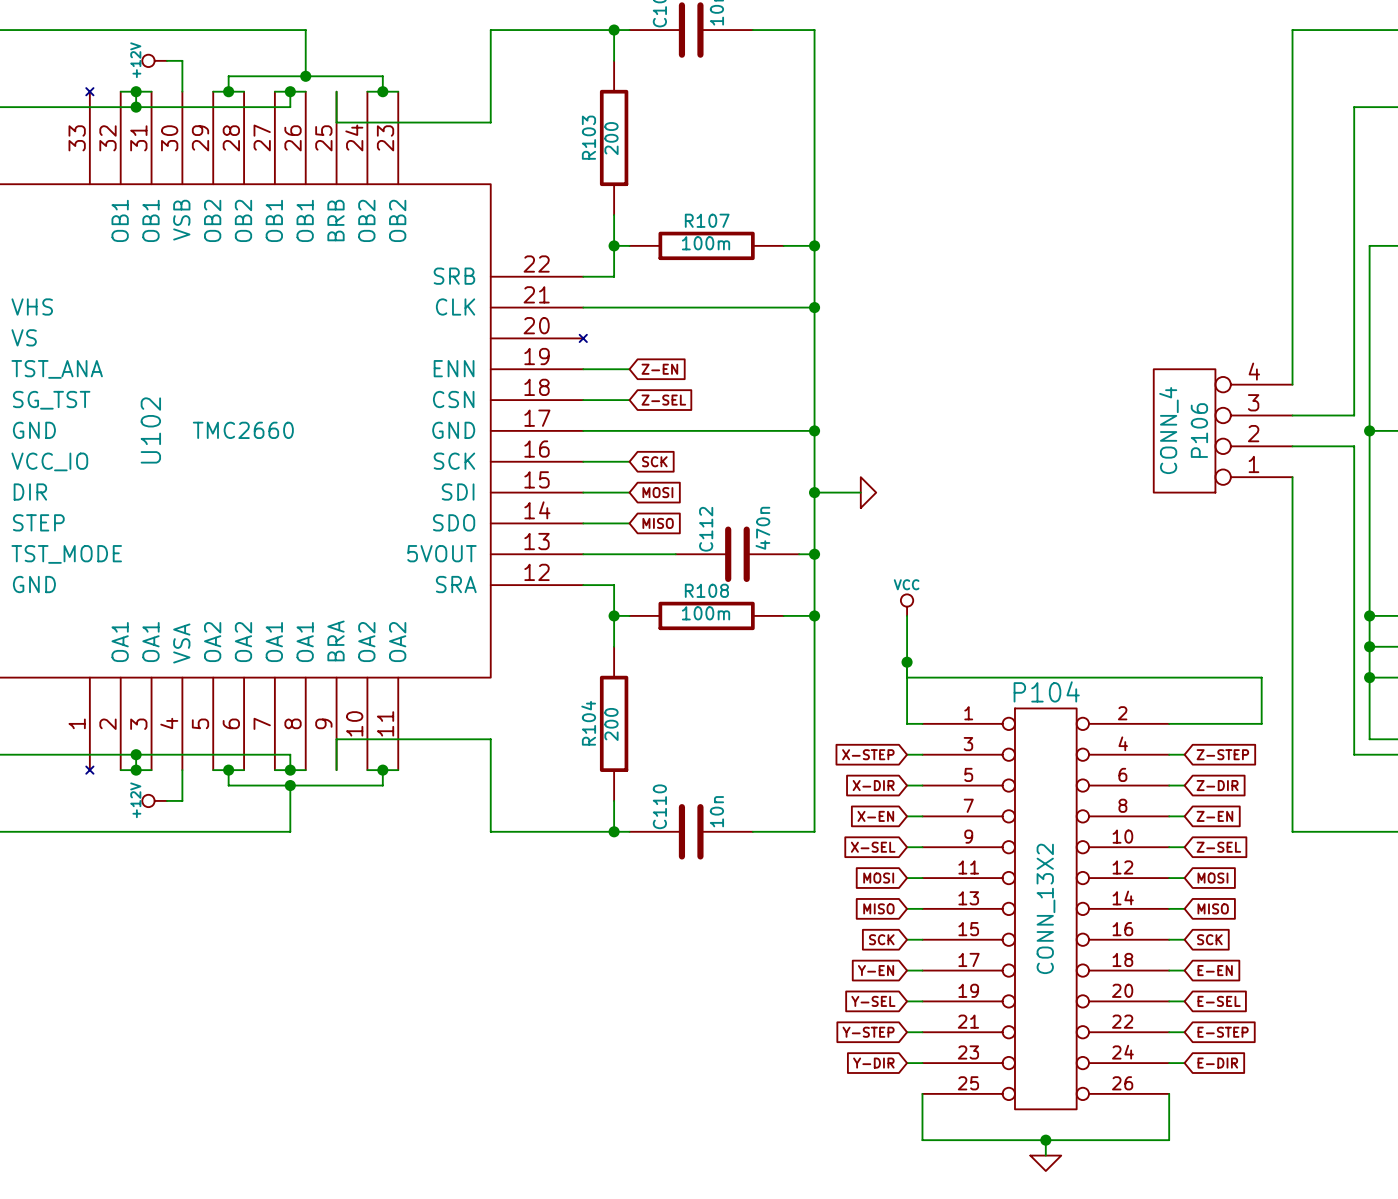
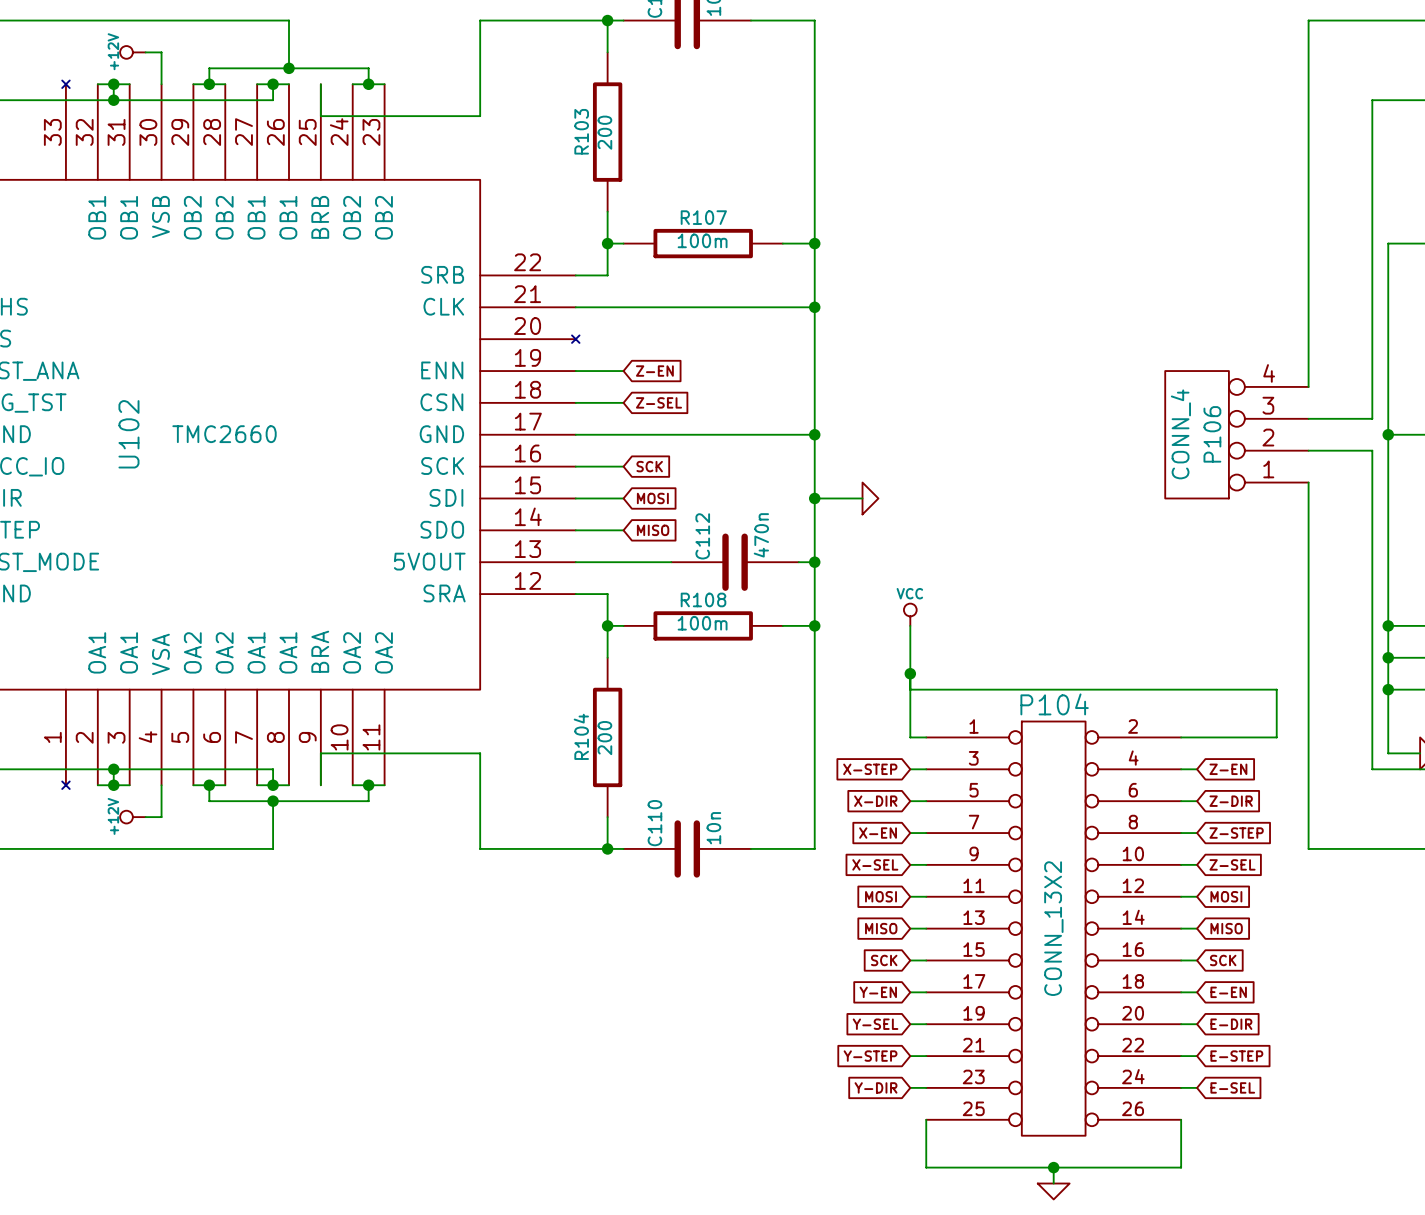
global label: Z-STEP (1222, 754) -> Z-EN (1228, 769)
global label: Z-EN (1214, 816) -> Z-STEP (1236, 833)
global label: E-SEL (1219, 1001) -> E-DIR (1231, 1024)
global label: E-DIR (1217, 1063) -> E-SEL (1232, 1087)

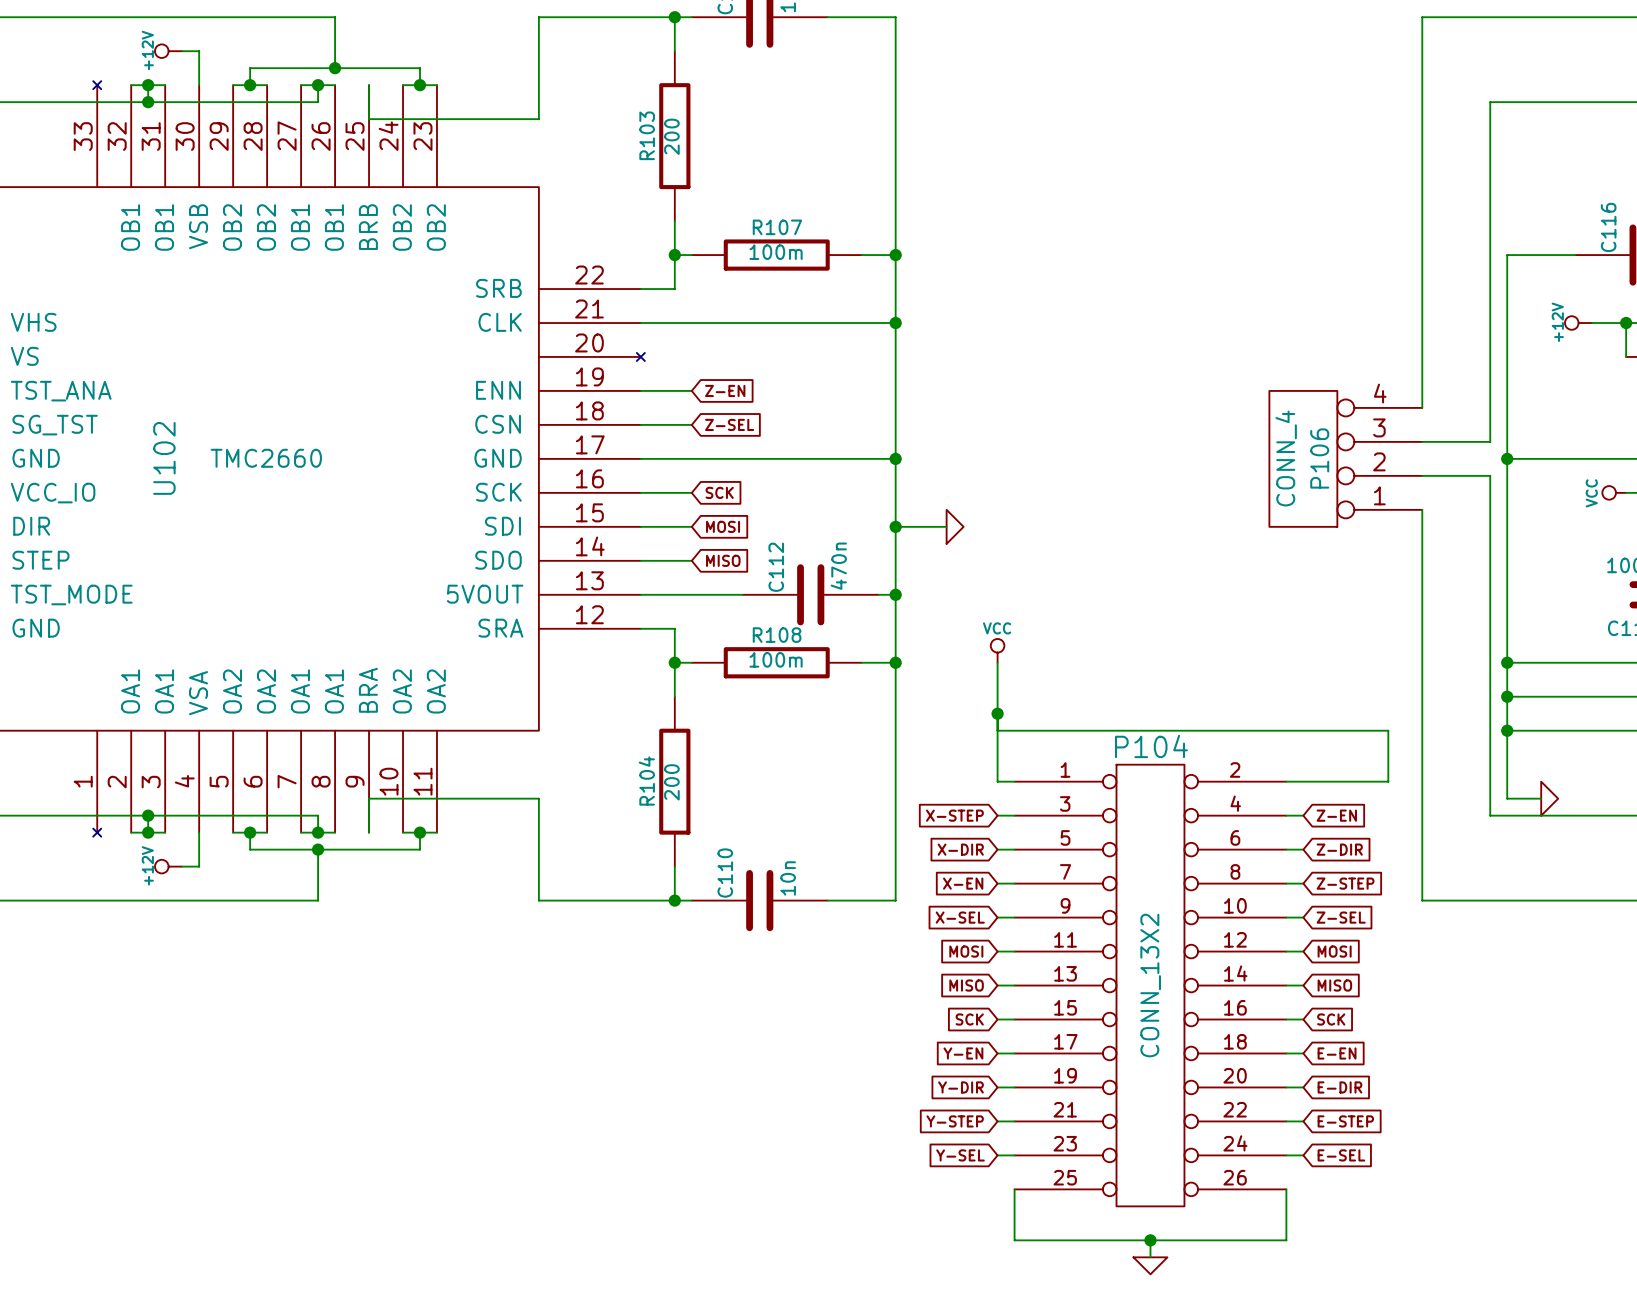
global label: Y-SEL (875, 1024) -> Y-DIR (960, 1087)
global label: Y-DIR (876, 1087) -> Y-SEL (960, 1155)

